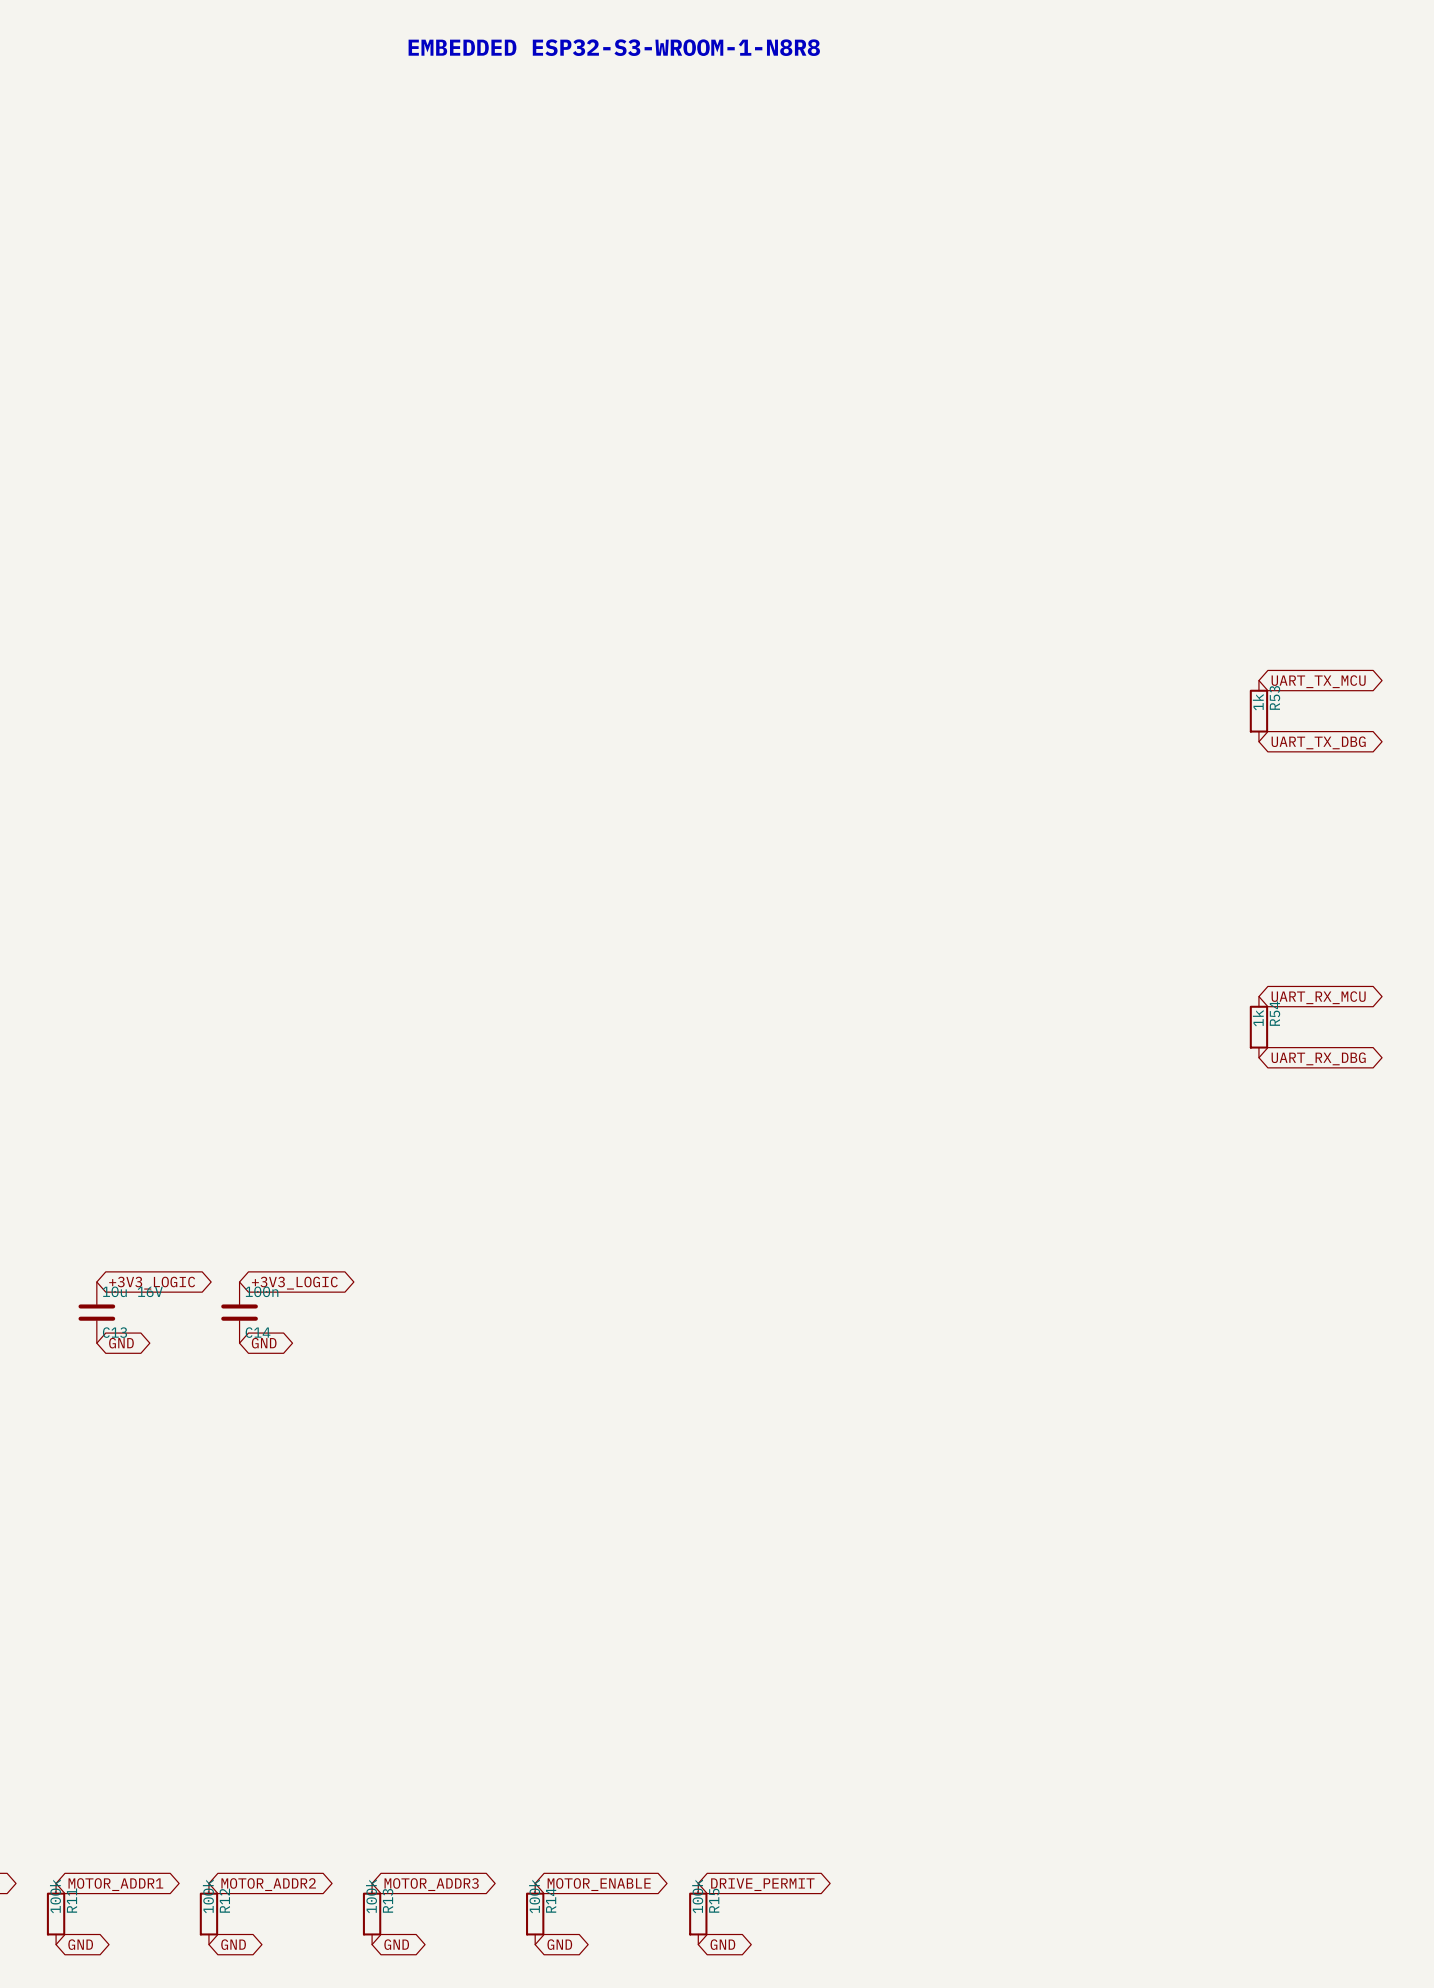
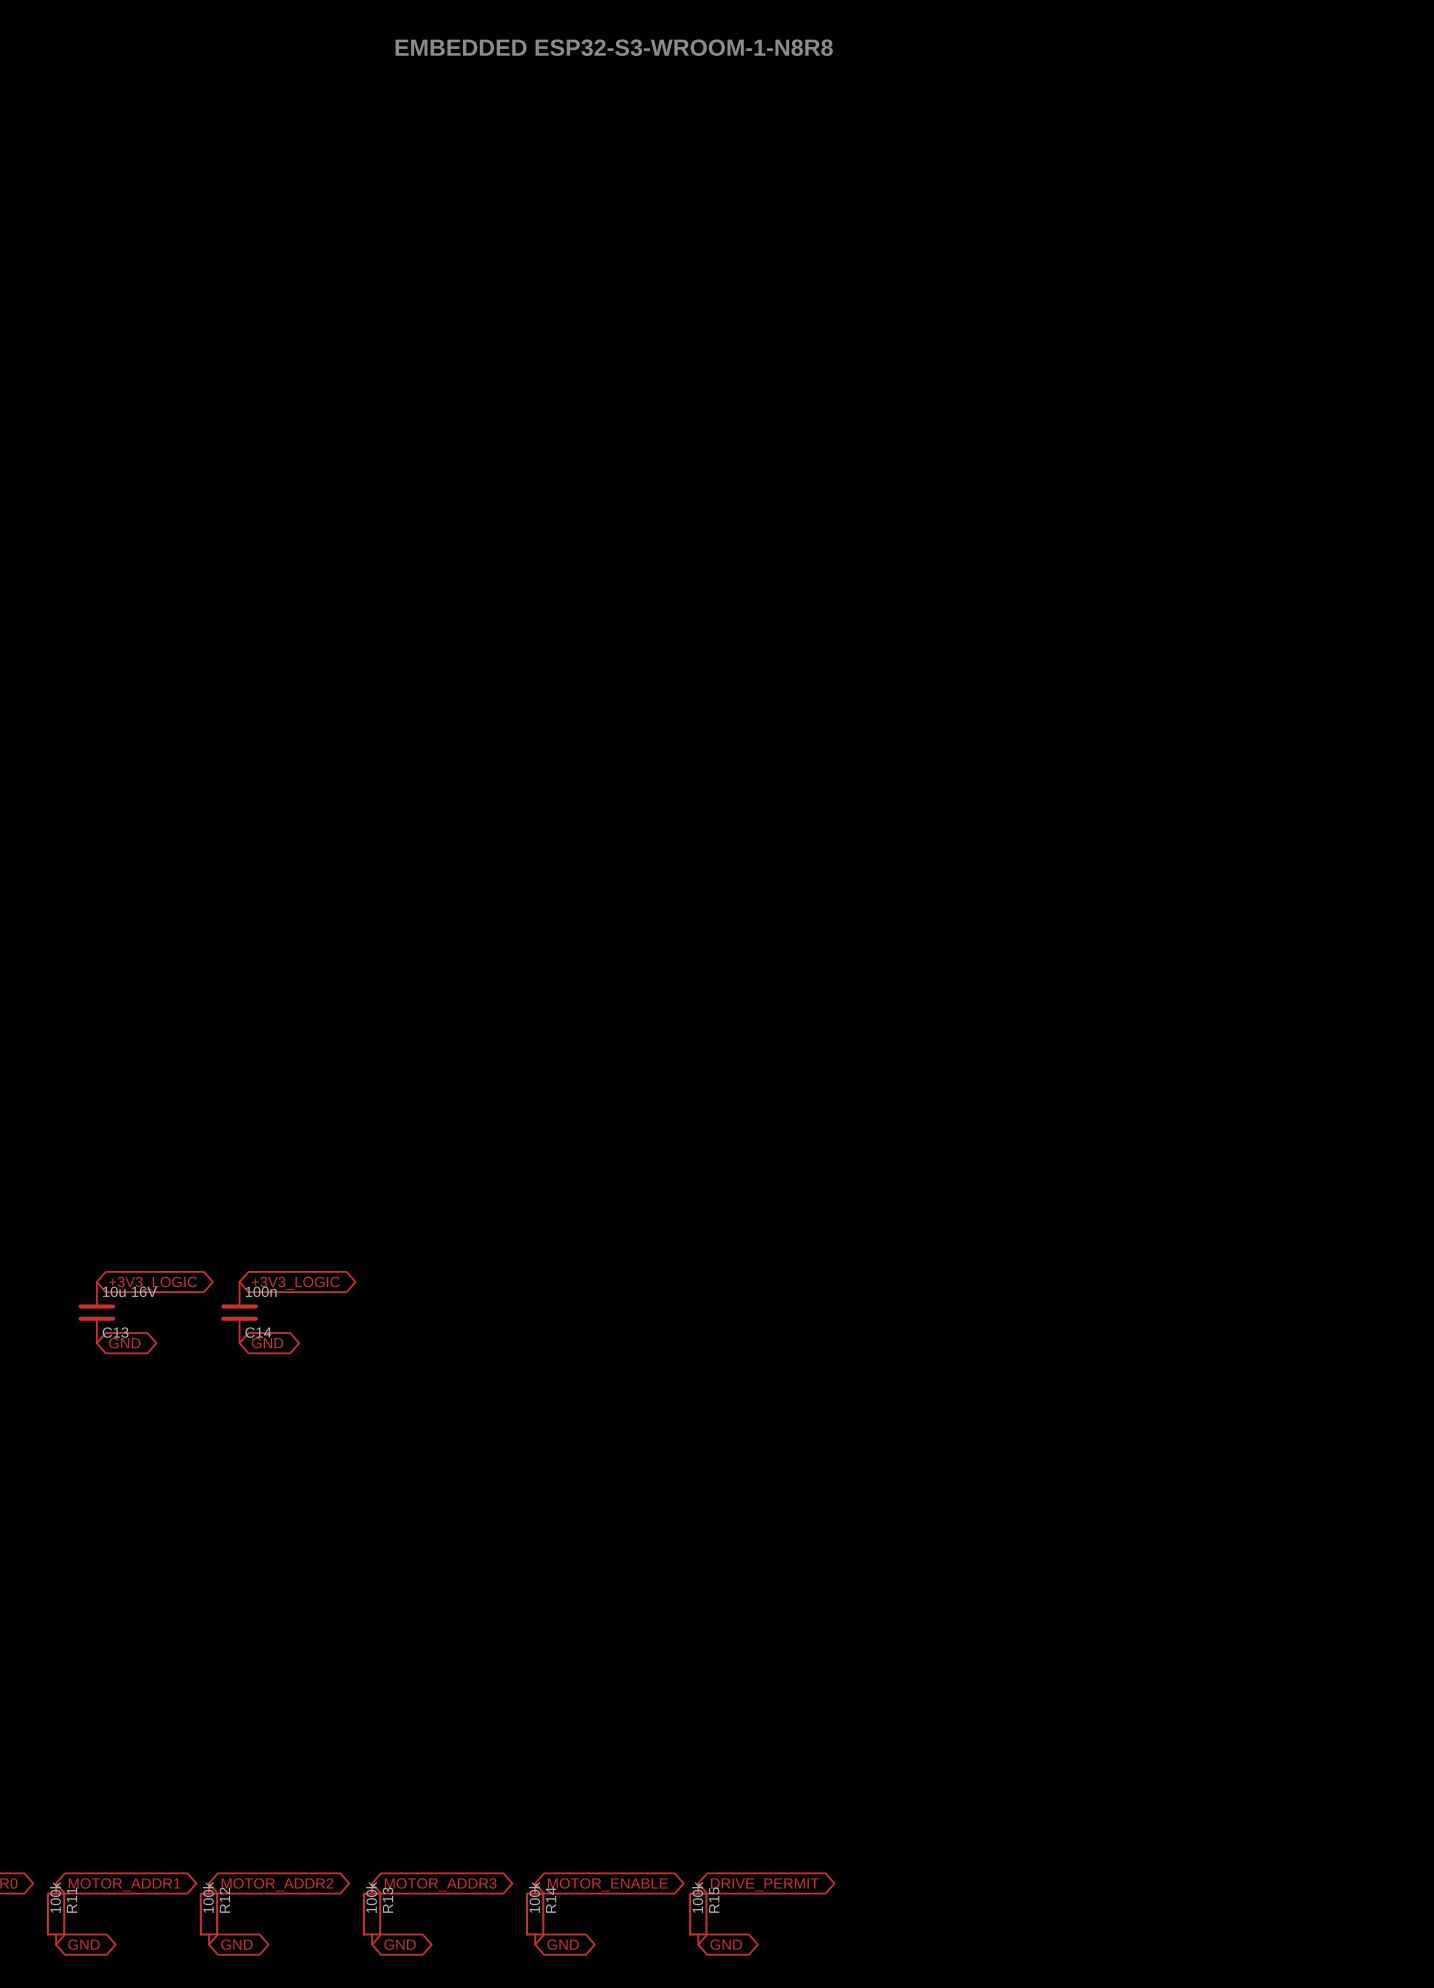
global label: UART_TX_MCU (1318, 681) -> none
R53: 1k (1258, 711) -> none
global label: UART_TX_DBG (1318, 742) -> none
global label: UART_RX_MCU (1318, 997) -> none
R54: 1k (1258, 1027) -> none
global label: UART_RX_DBG (1318, 1058) -> none

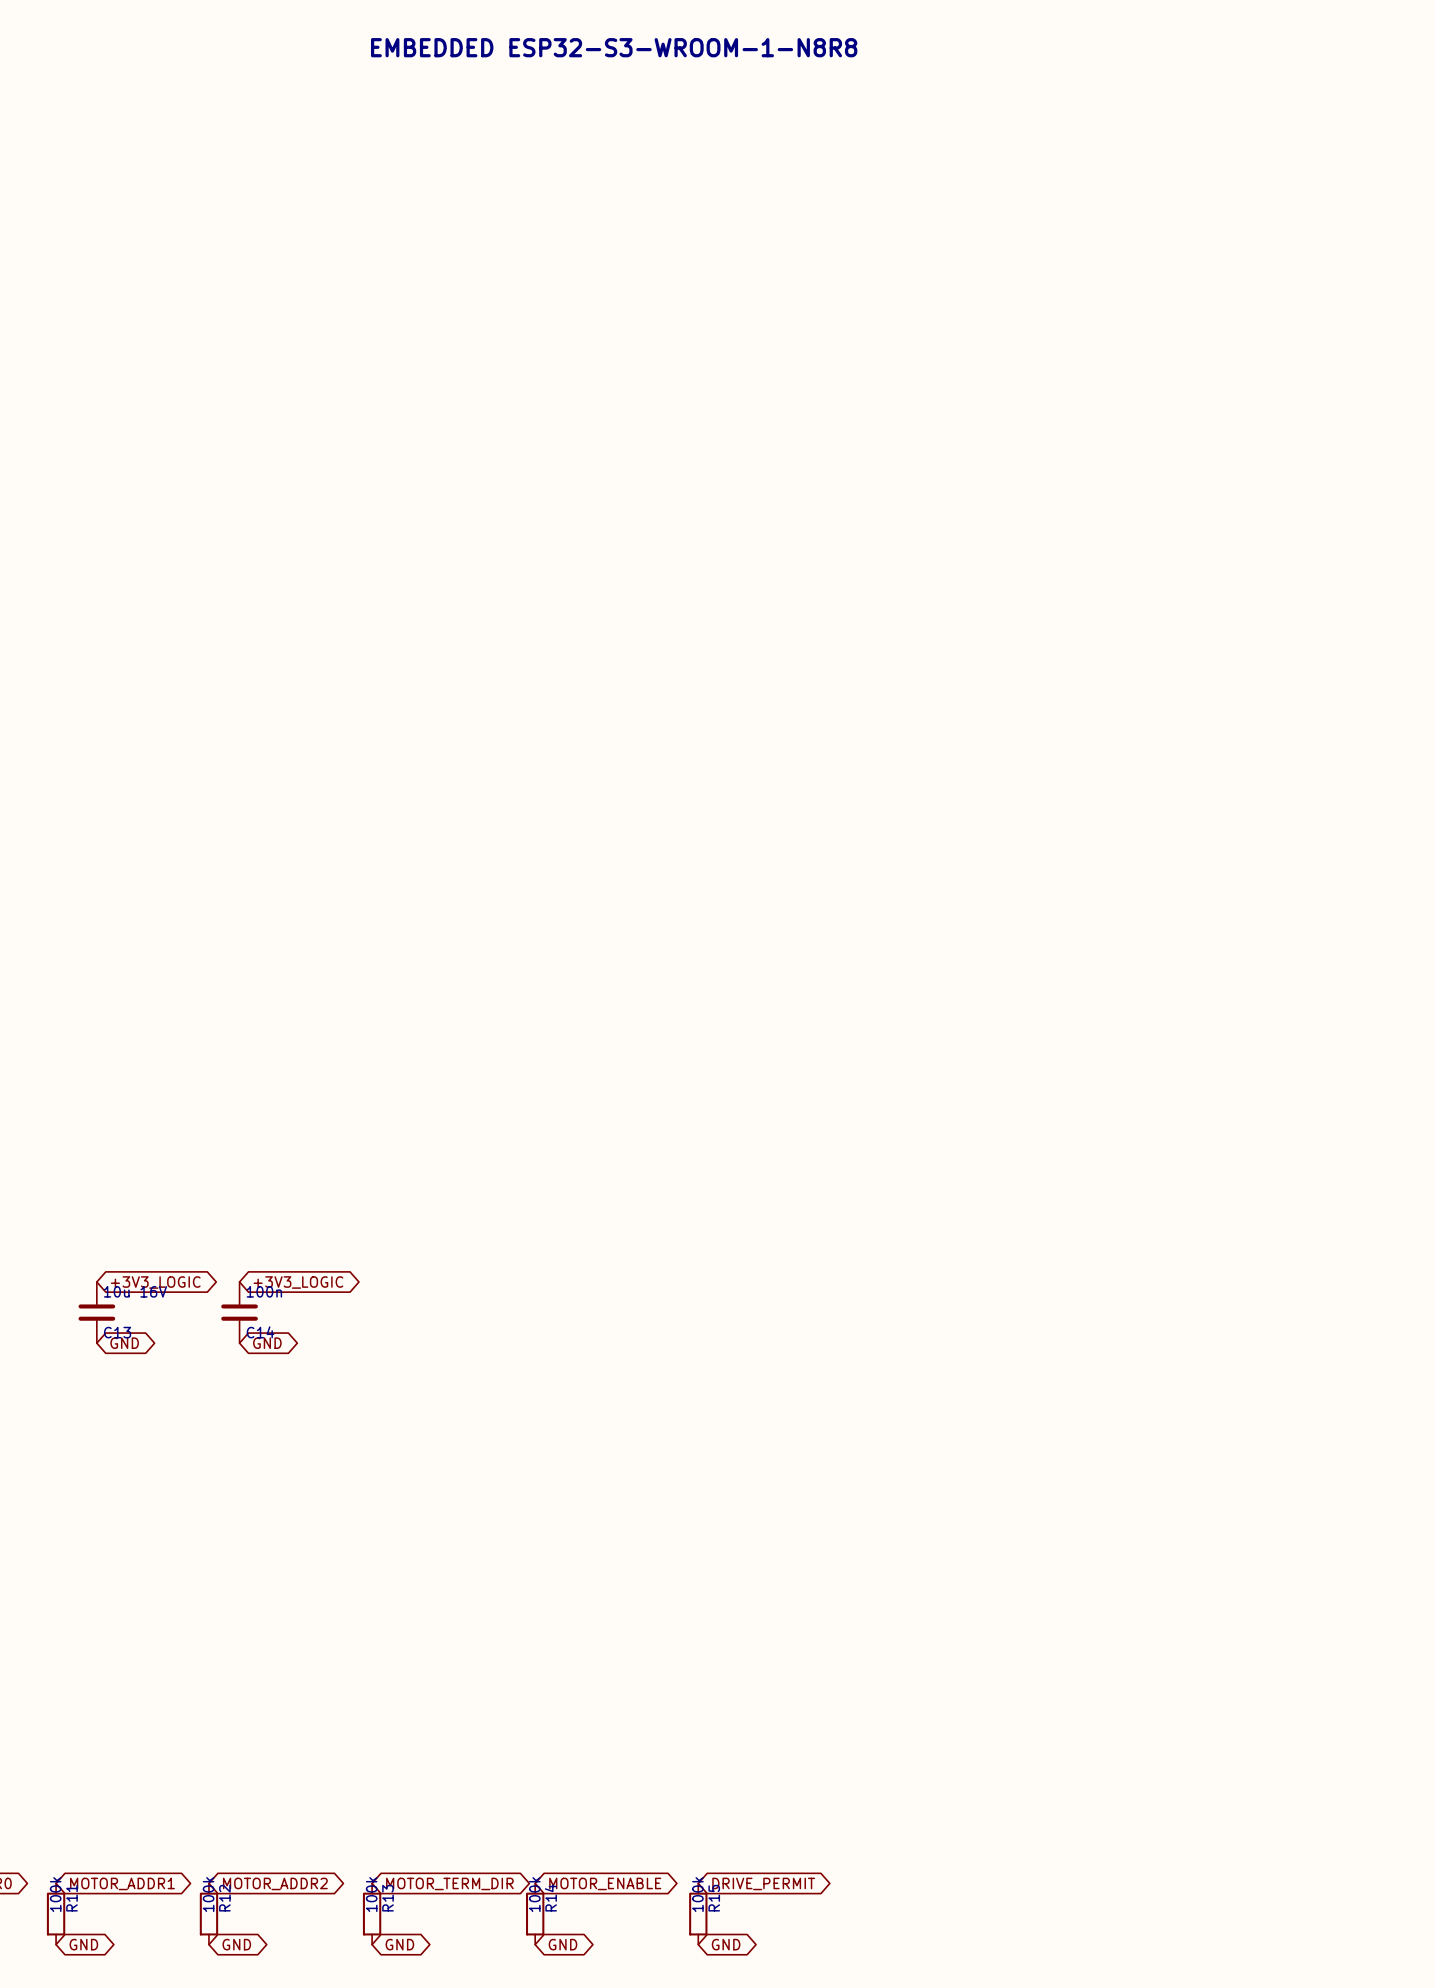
global label: MOTOR_ADDR3 (440, 1884) -> MOTOR_TERM_DIR (449, 1883)

